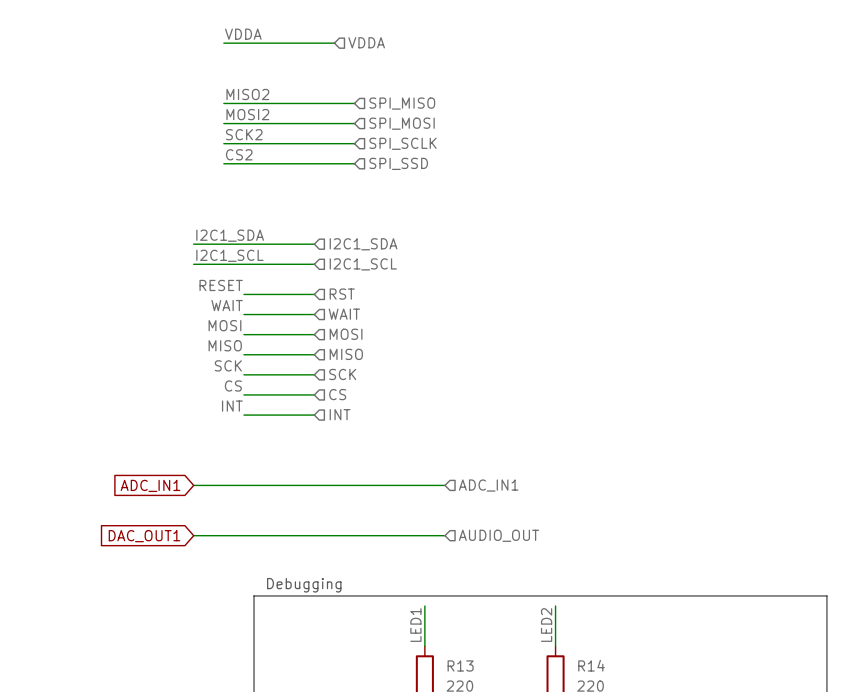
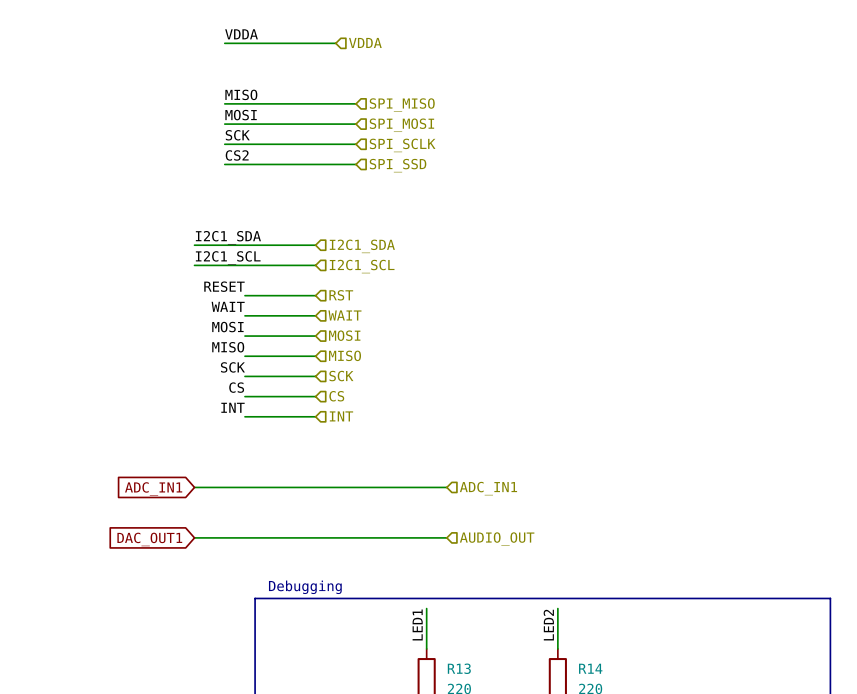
label: MISO2 (247, 94) -> MISO (241, 94)
label: MOSI2 (247, 114) -> MOSI (241, 115)
label: SCK2 (244, 134) -> SCK (237, 135)

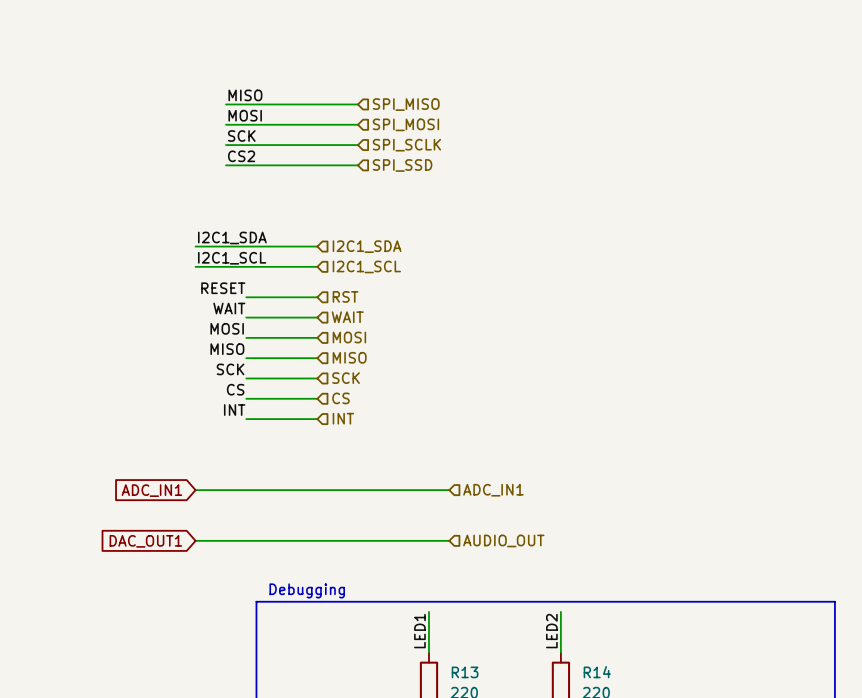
label: VDDA (241, 34) -> none
hierarchical label: VDDA (365, 42) -> none
wire: (224, 43) (335, 43) -> none

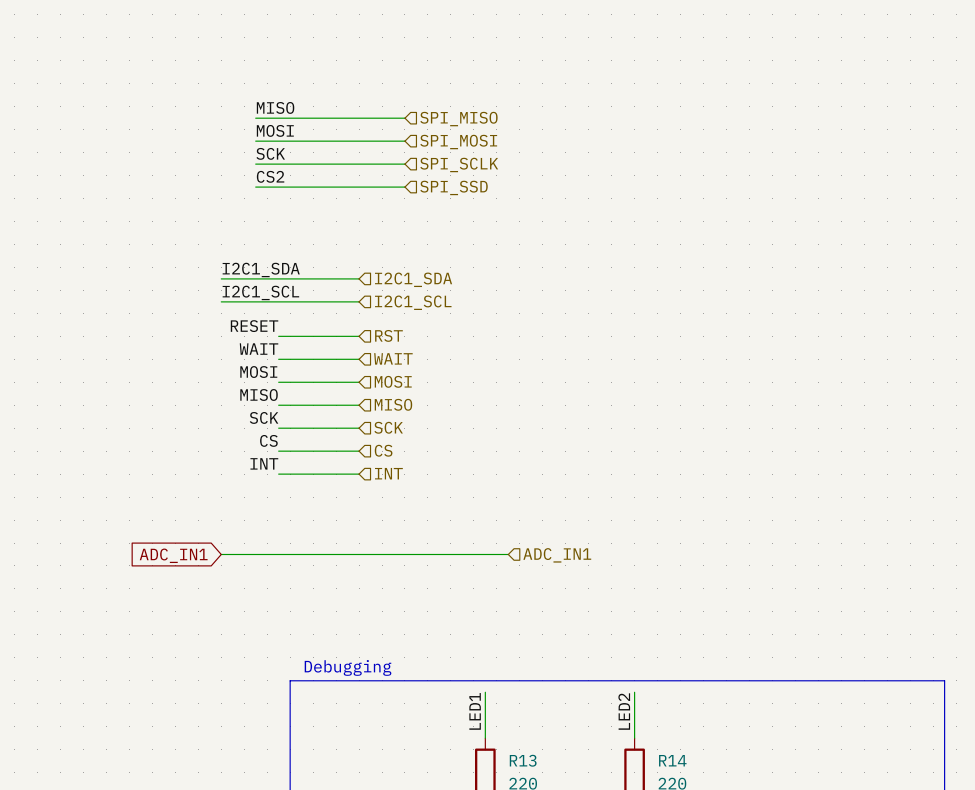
wire: (195, 540) (449, 540) -> none
hierarchical label: AUDIO_OUT (503, 540) -> none
global label: DAC_OUT1 (145, 541) -> none

